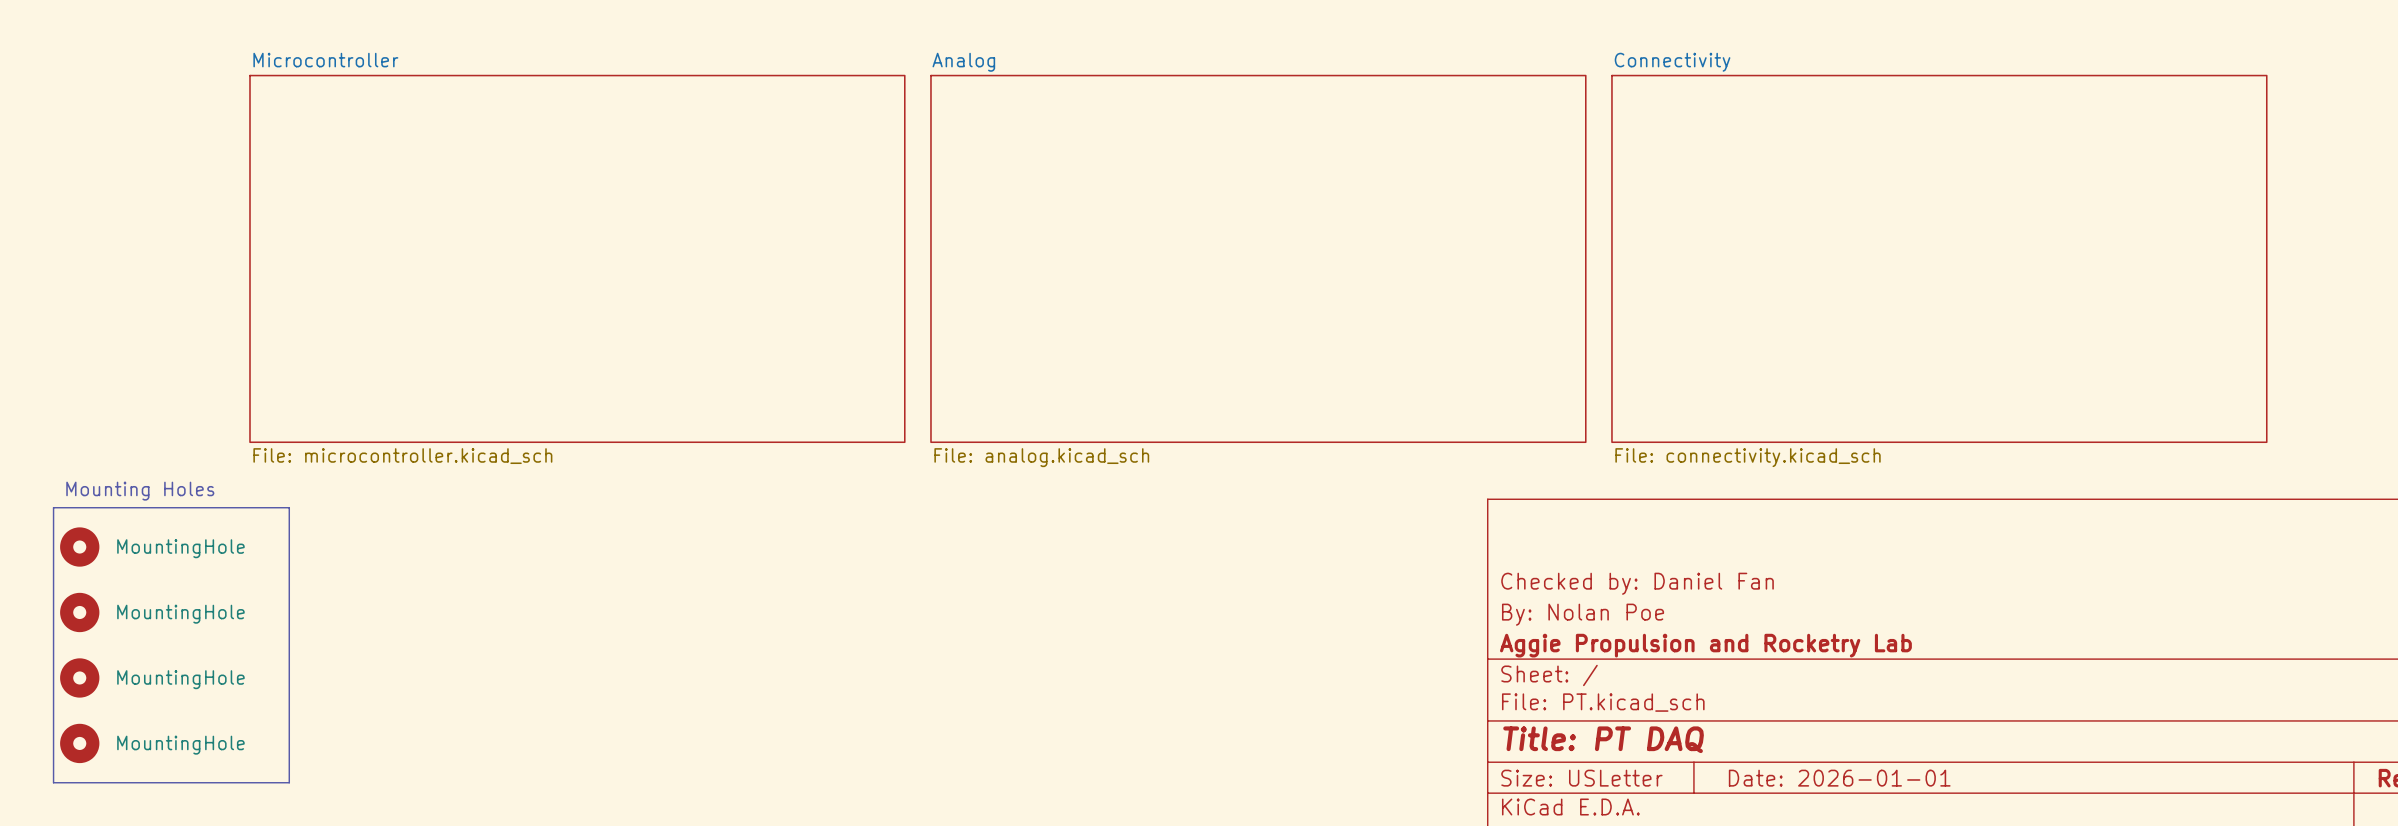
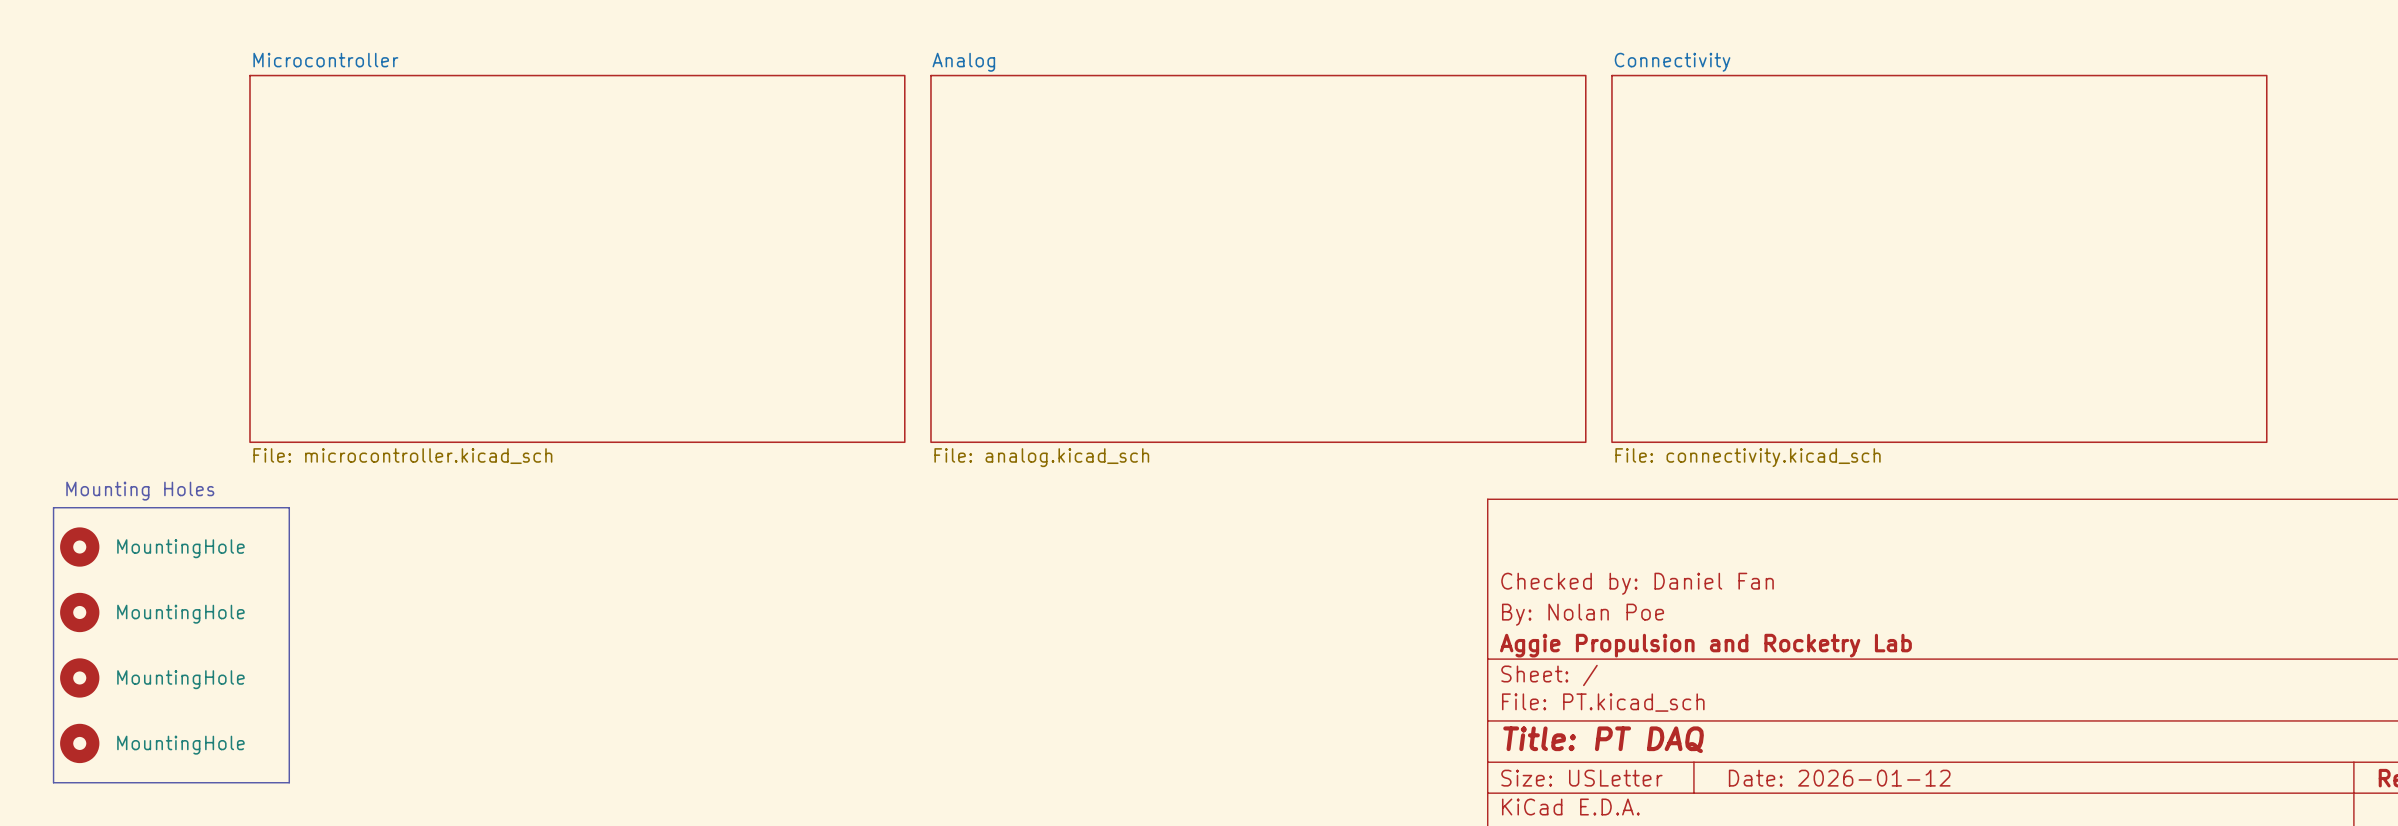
title block: Date: 2026-01-01 (1839, 778) -> Date: 2026-01-12 (1839, 778)

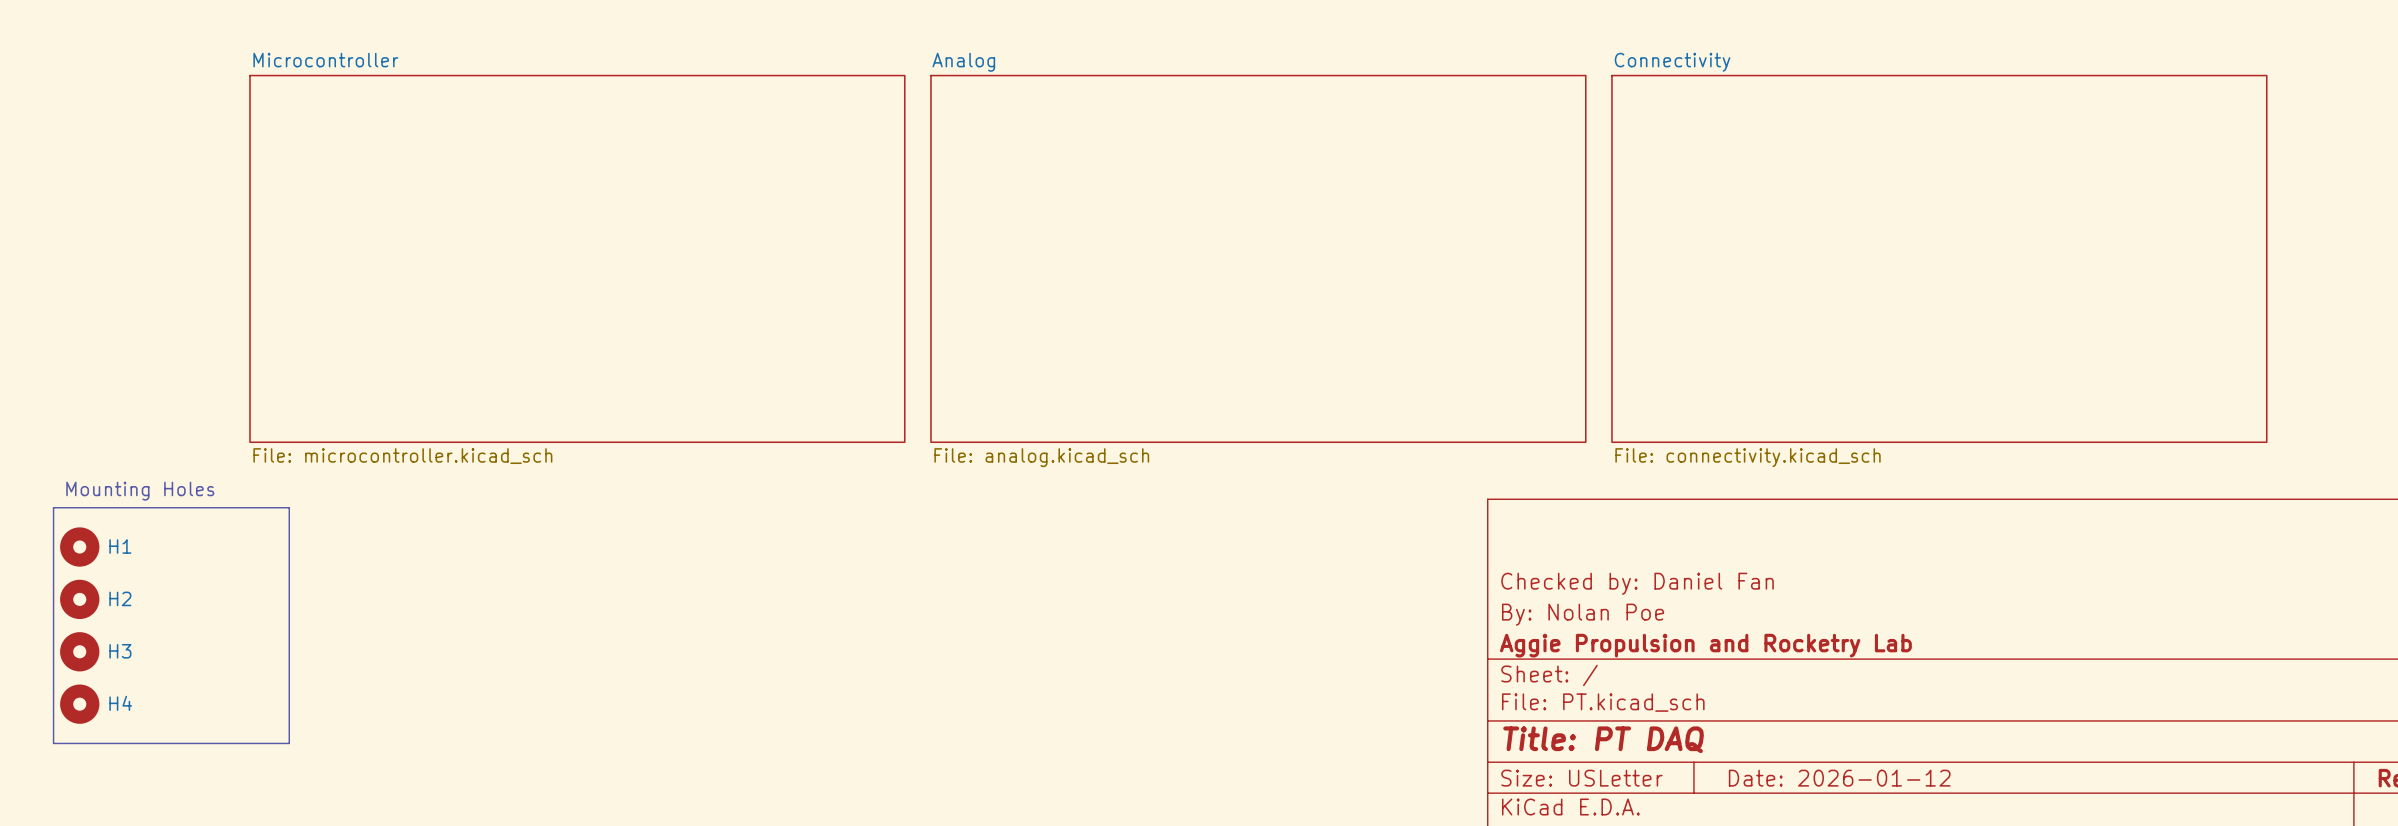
H1 name: none -> H1 (120, 546)
H1 value: MountingHole (180, 548) -> none
H2: none -> (79, 599)
part: MountingHole (79, 612) -> none
H3: none -> (79, 651)
part: MountingHole (79, 677) -> none
H4: none -> (79, 704)
line: (53, 743) (53, 782) (289, 782) (289, 743) -> (53, 743) (289, 743)
part: MountingHole (79, 743) -> none

